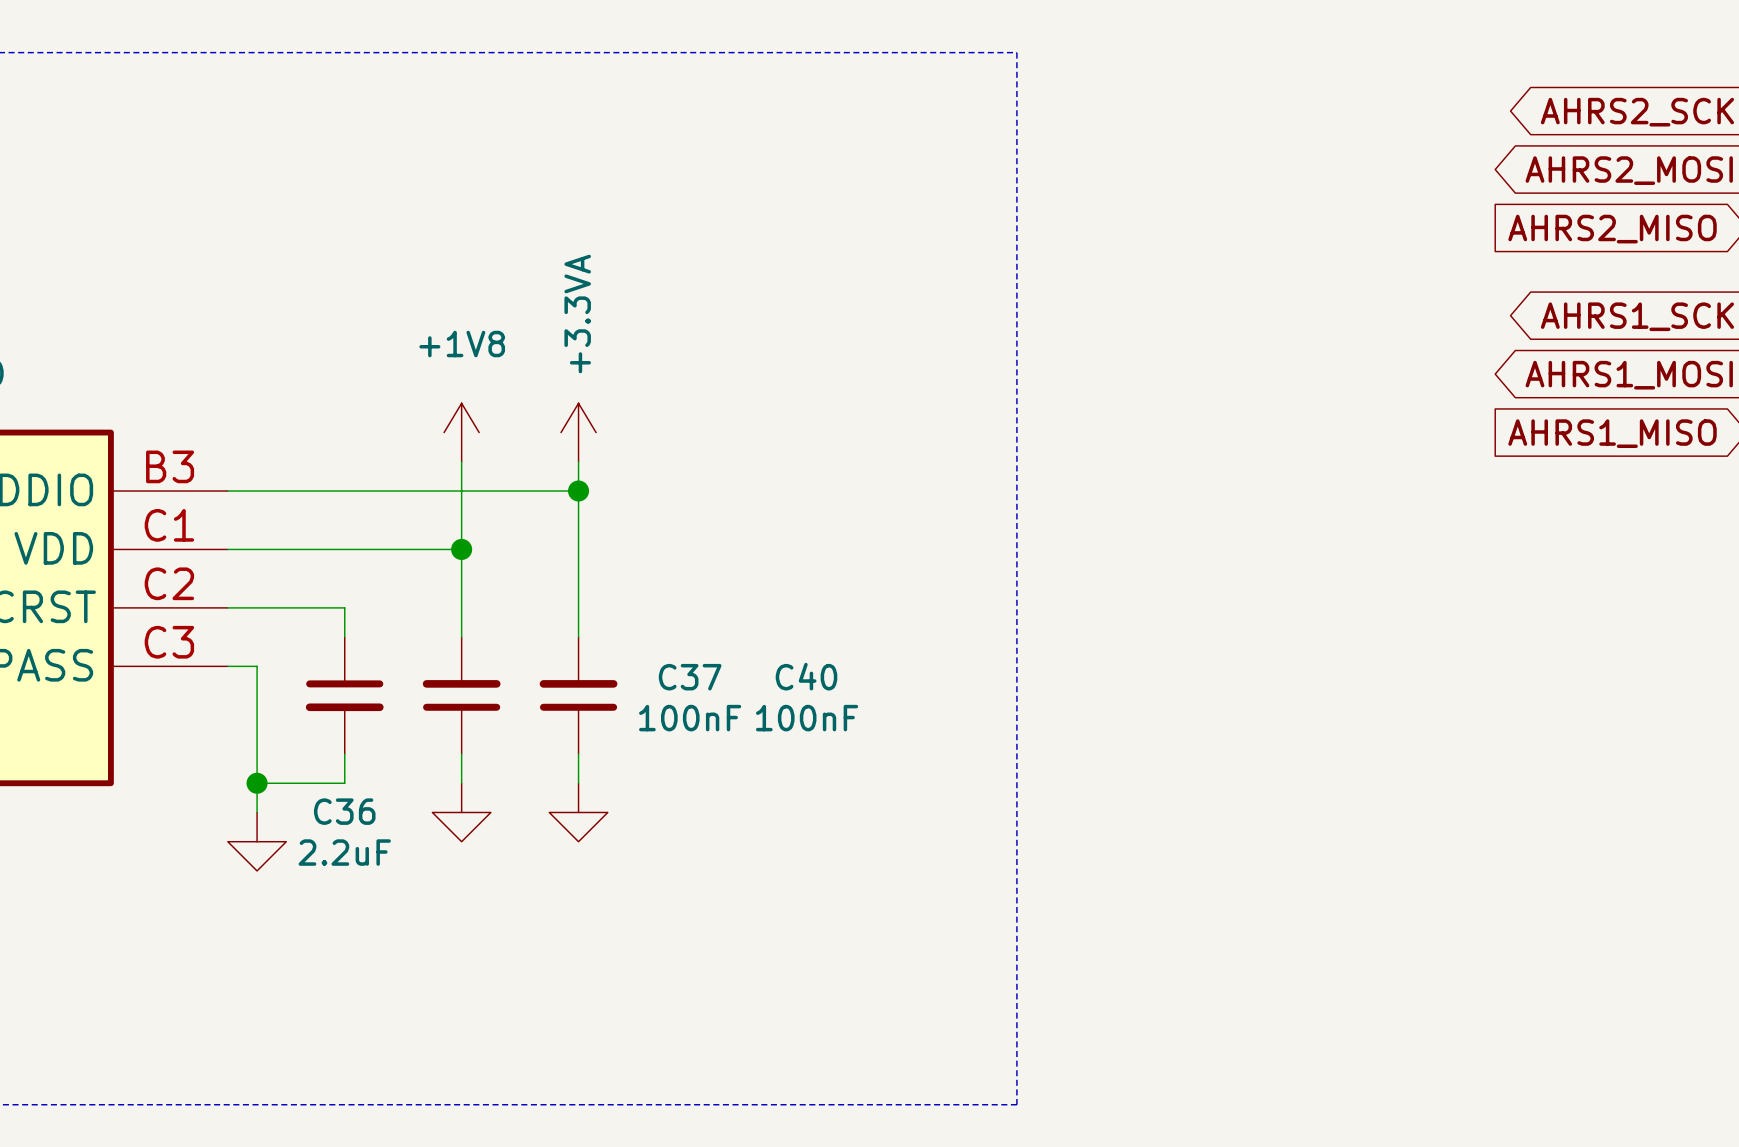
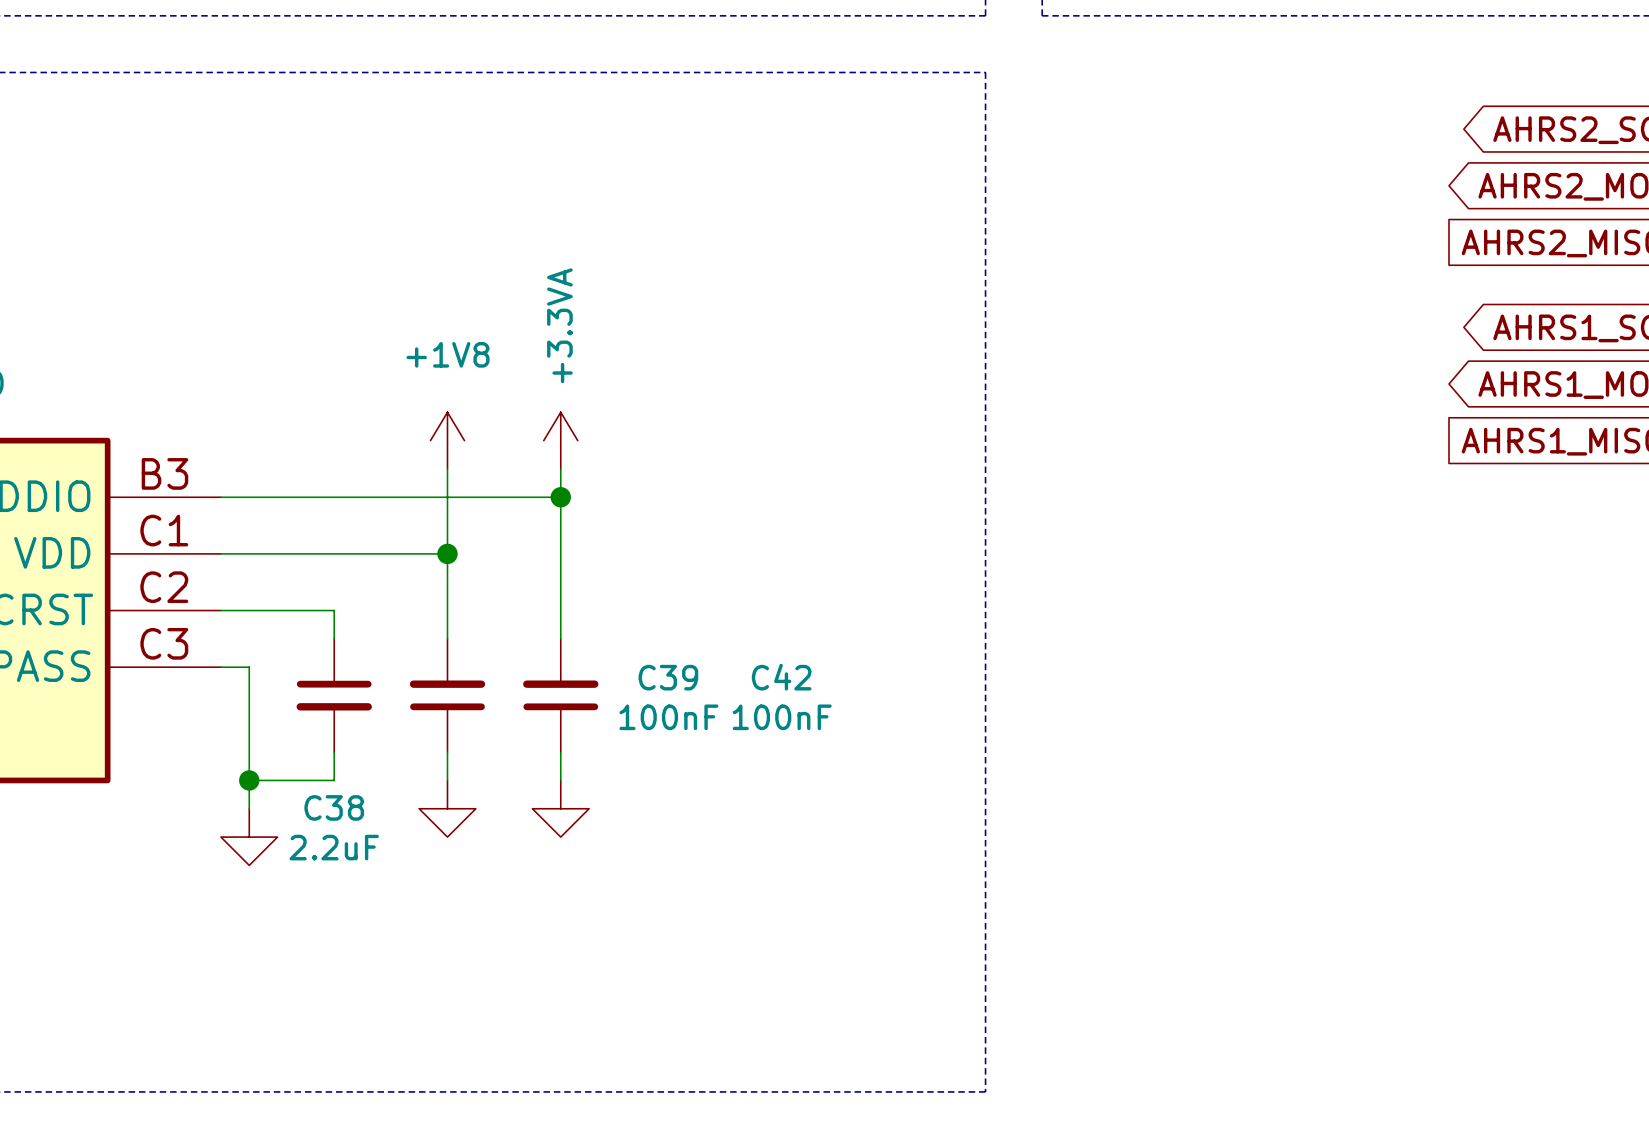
C40 name: C40 (806, 676) -> C42 (781, 677)
C37 name: C37 (690, 677) -> C39 (668, 677)
C36 name: C36 (344, 811) -> C38 (334, 807)

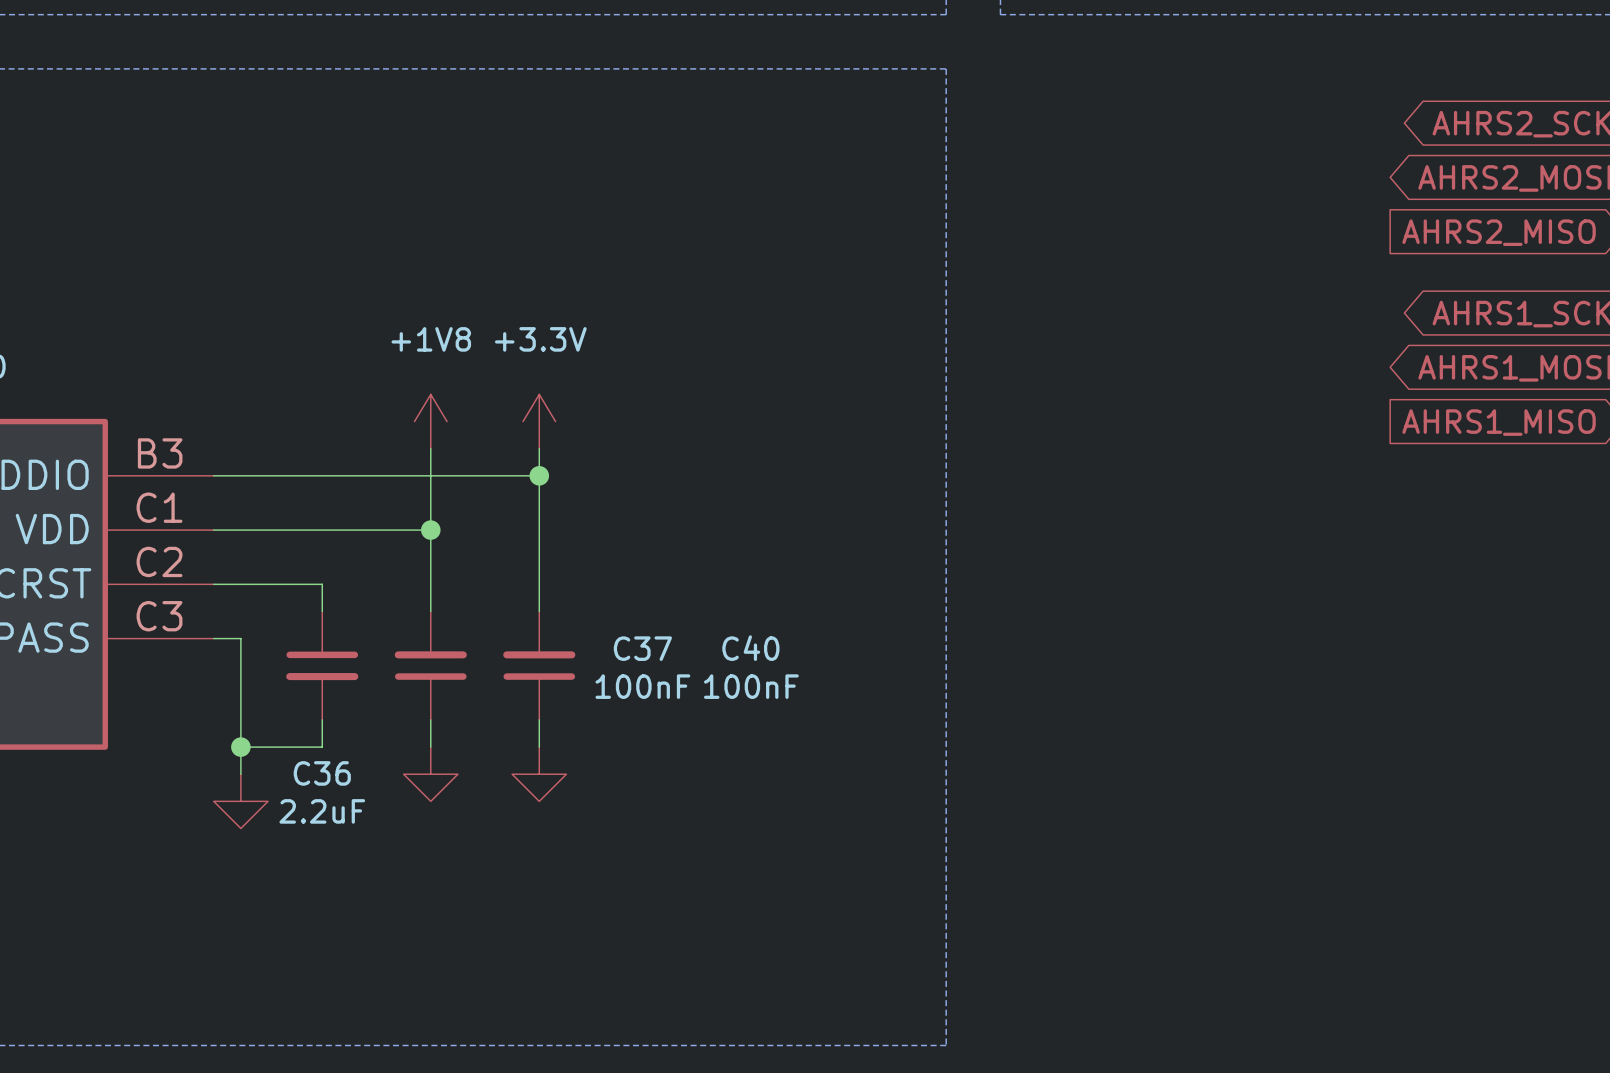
power symbol: +3.3VA (560, 440) -> +3.3V (539, 421)
C39 name: C39 (668, 677) -> C37 (642, 648)
C42 name: C42 (781, 677) -> C40 (750, 648)
C38 name: C38 (334, 807) -> C36 (322, 773)

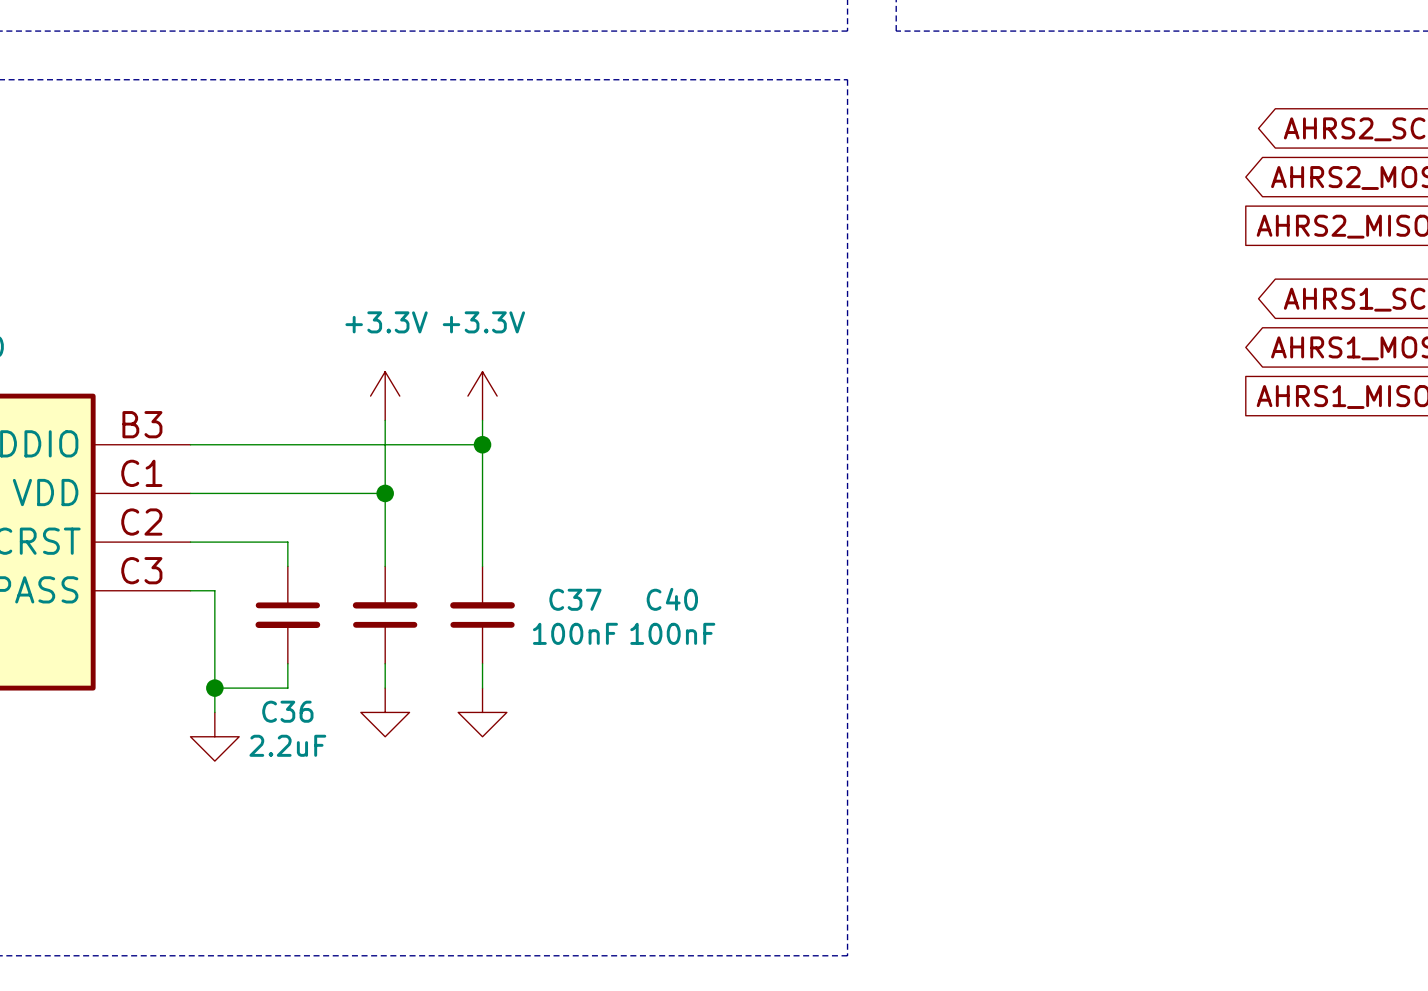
power symbol: +1V8 (430, 421) -> +3.3V (385, 396)

